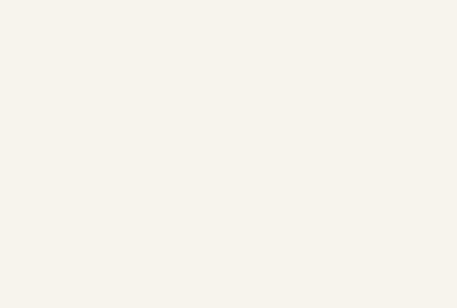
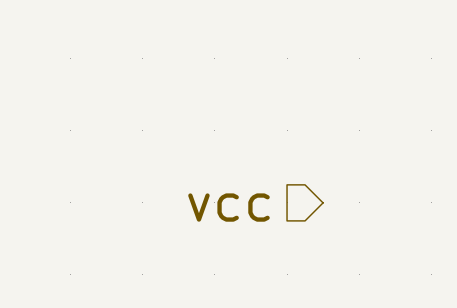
hierarchical label: none -> vcc (228, 207)

